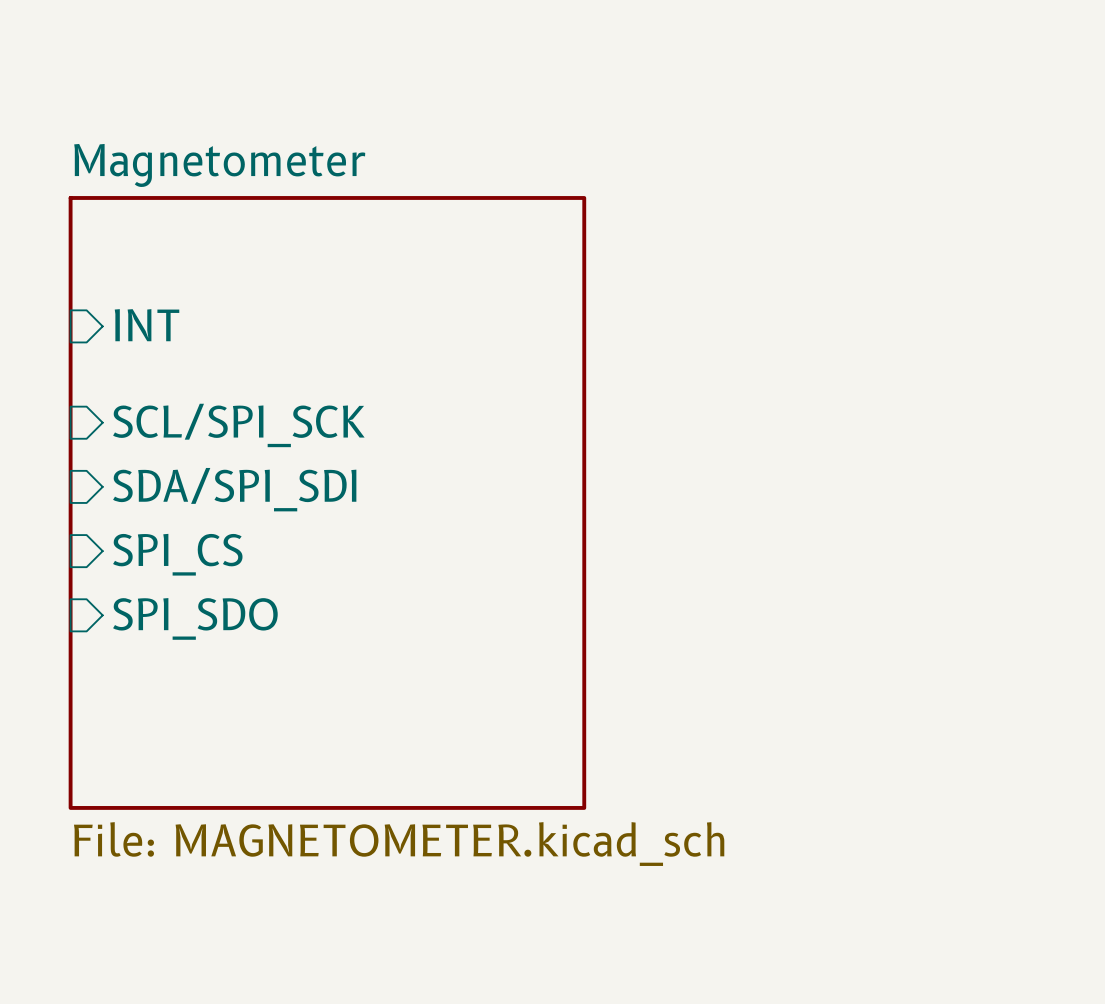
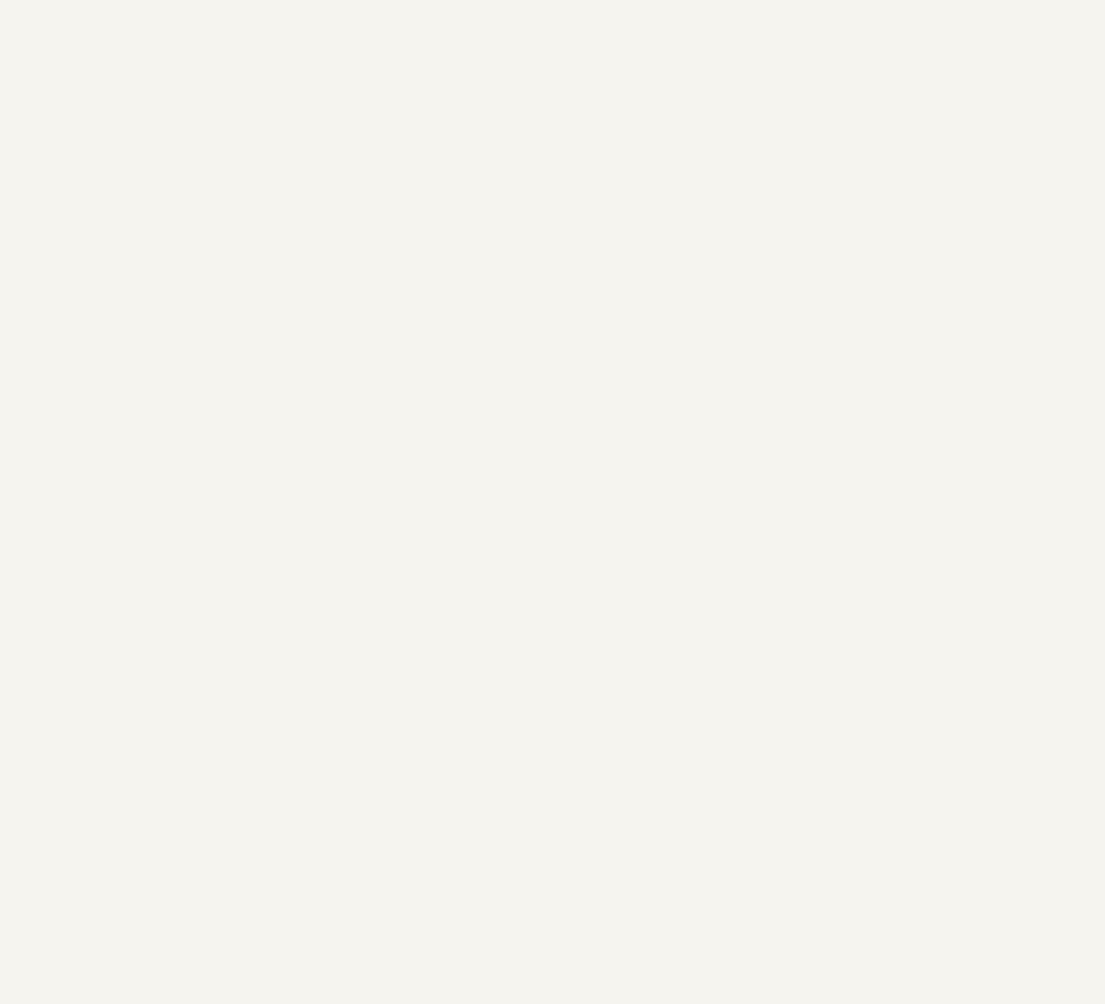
sheet pin: INT (147, 325) -> none
sheet pin: SCL/SPI_SCK (238, 425) -> none
sheet pin: SDA/SPI_SDI (234, 489) -> none
sheet Magnetometer: File: MAGNETOMETER.kicad_sch (327, 502) -> none
sheet pin: SPI_CS (177, 554) -> none
sheet pin: SPI_SDO (195, 618) -> none

